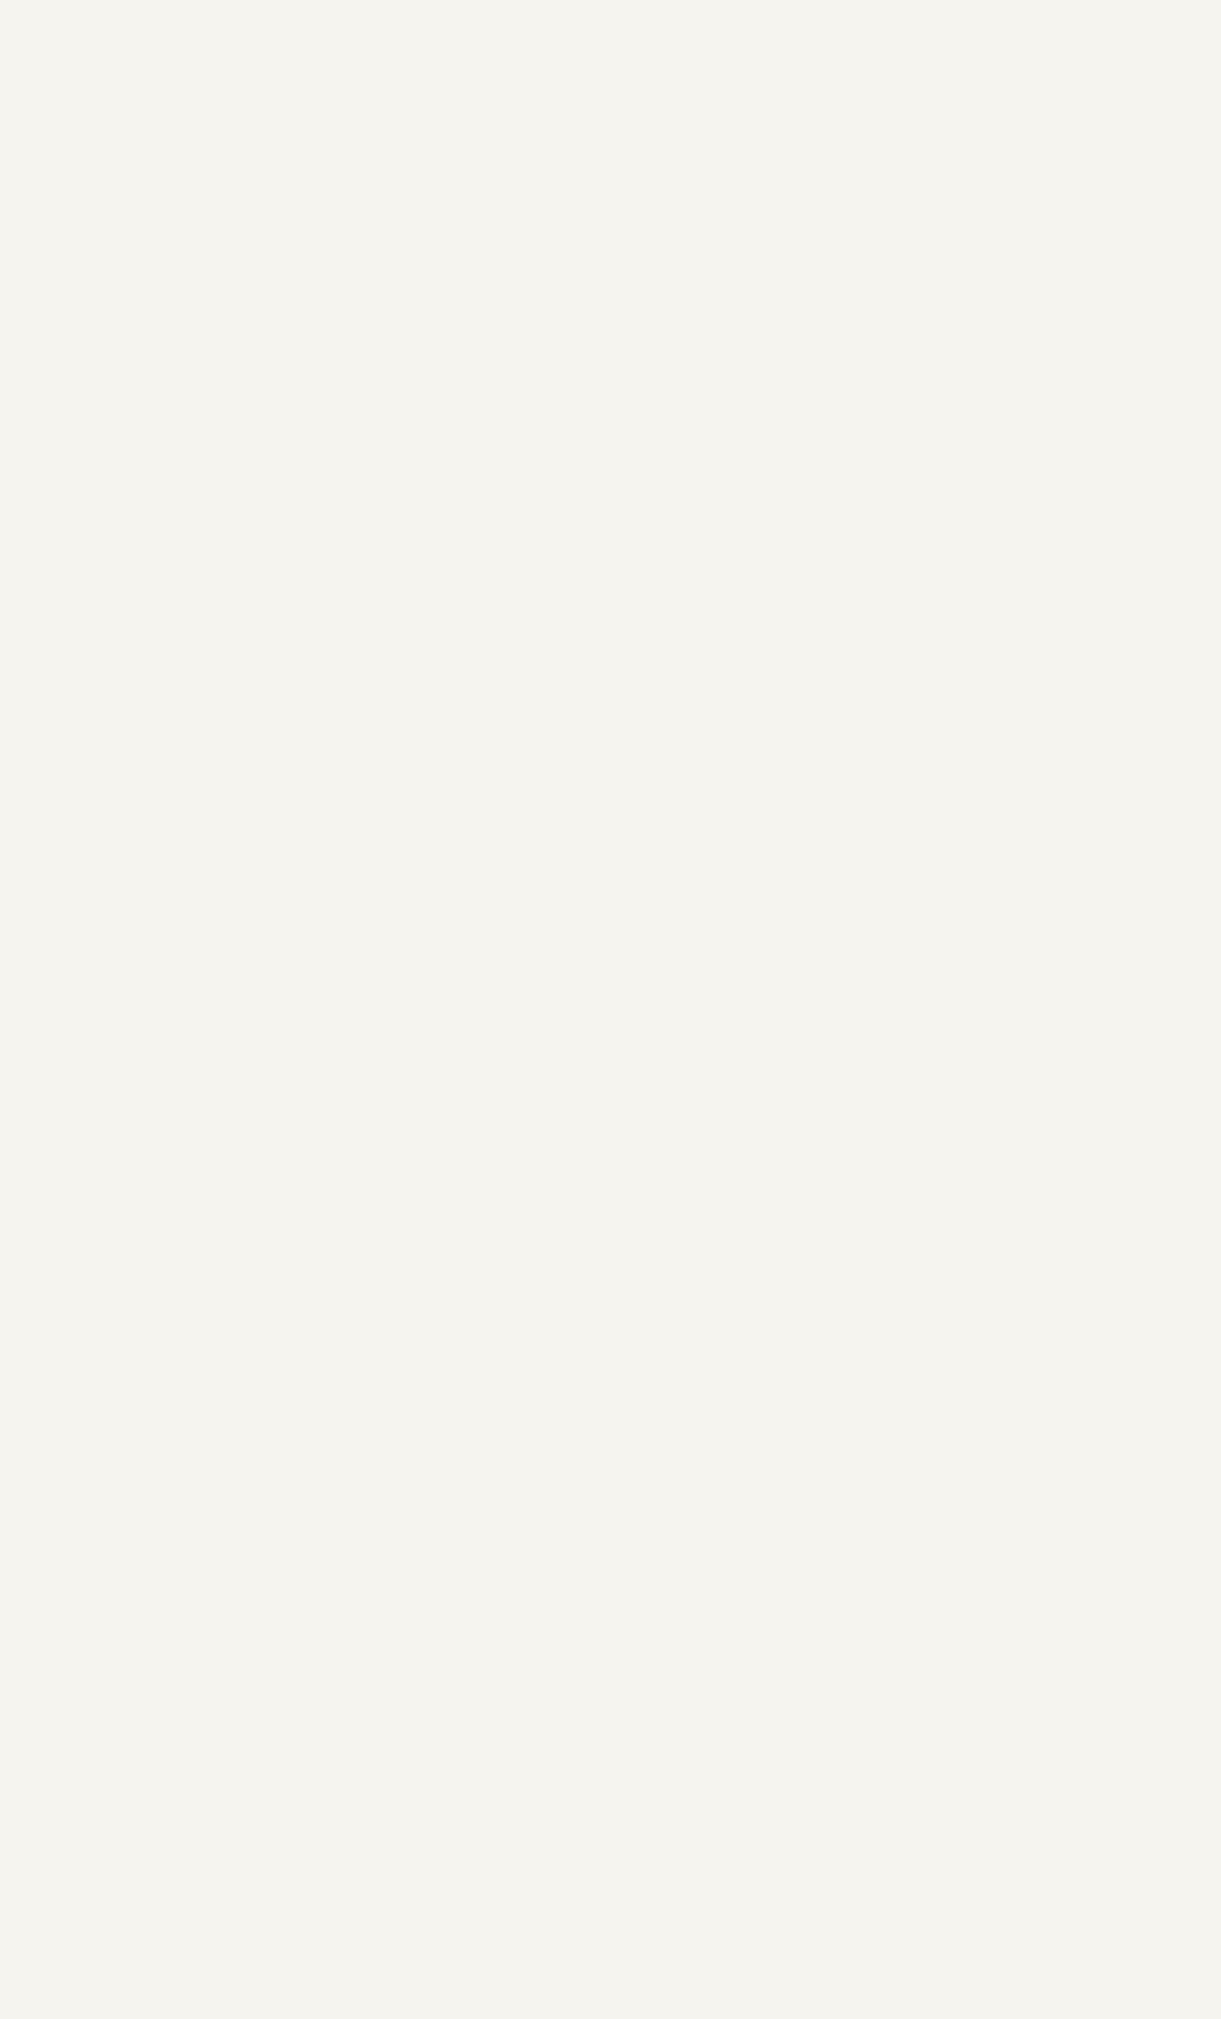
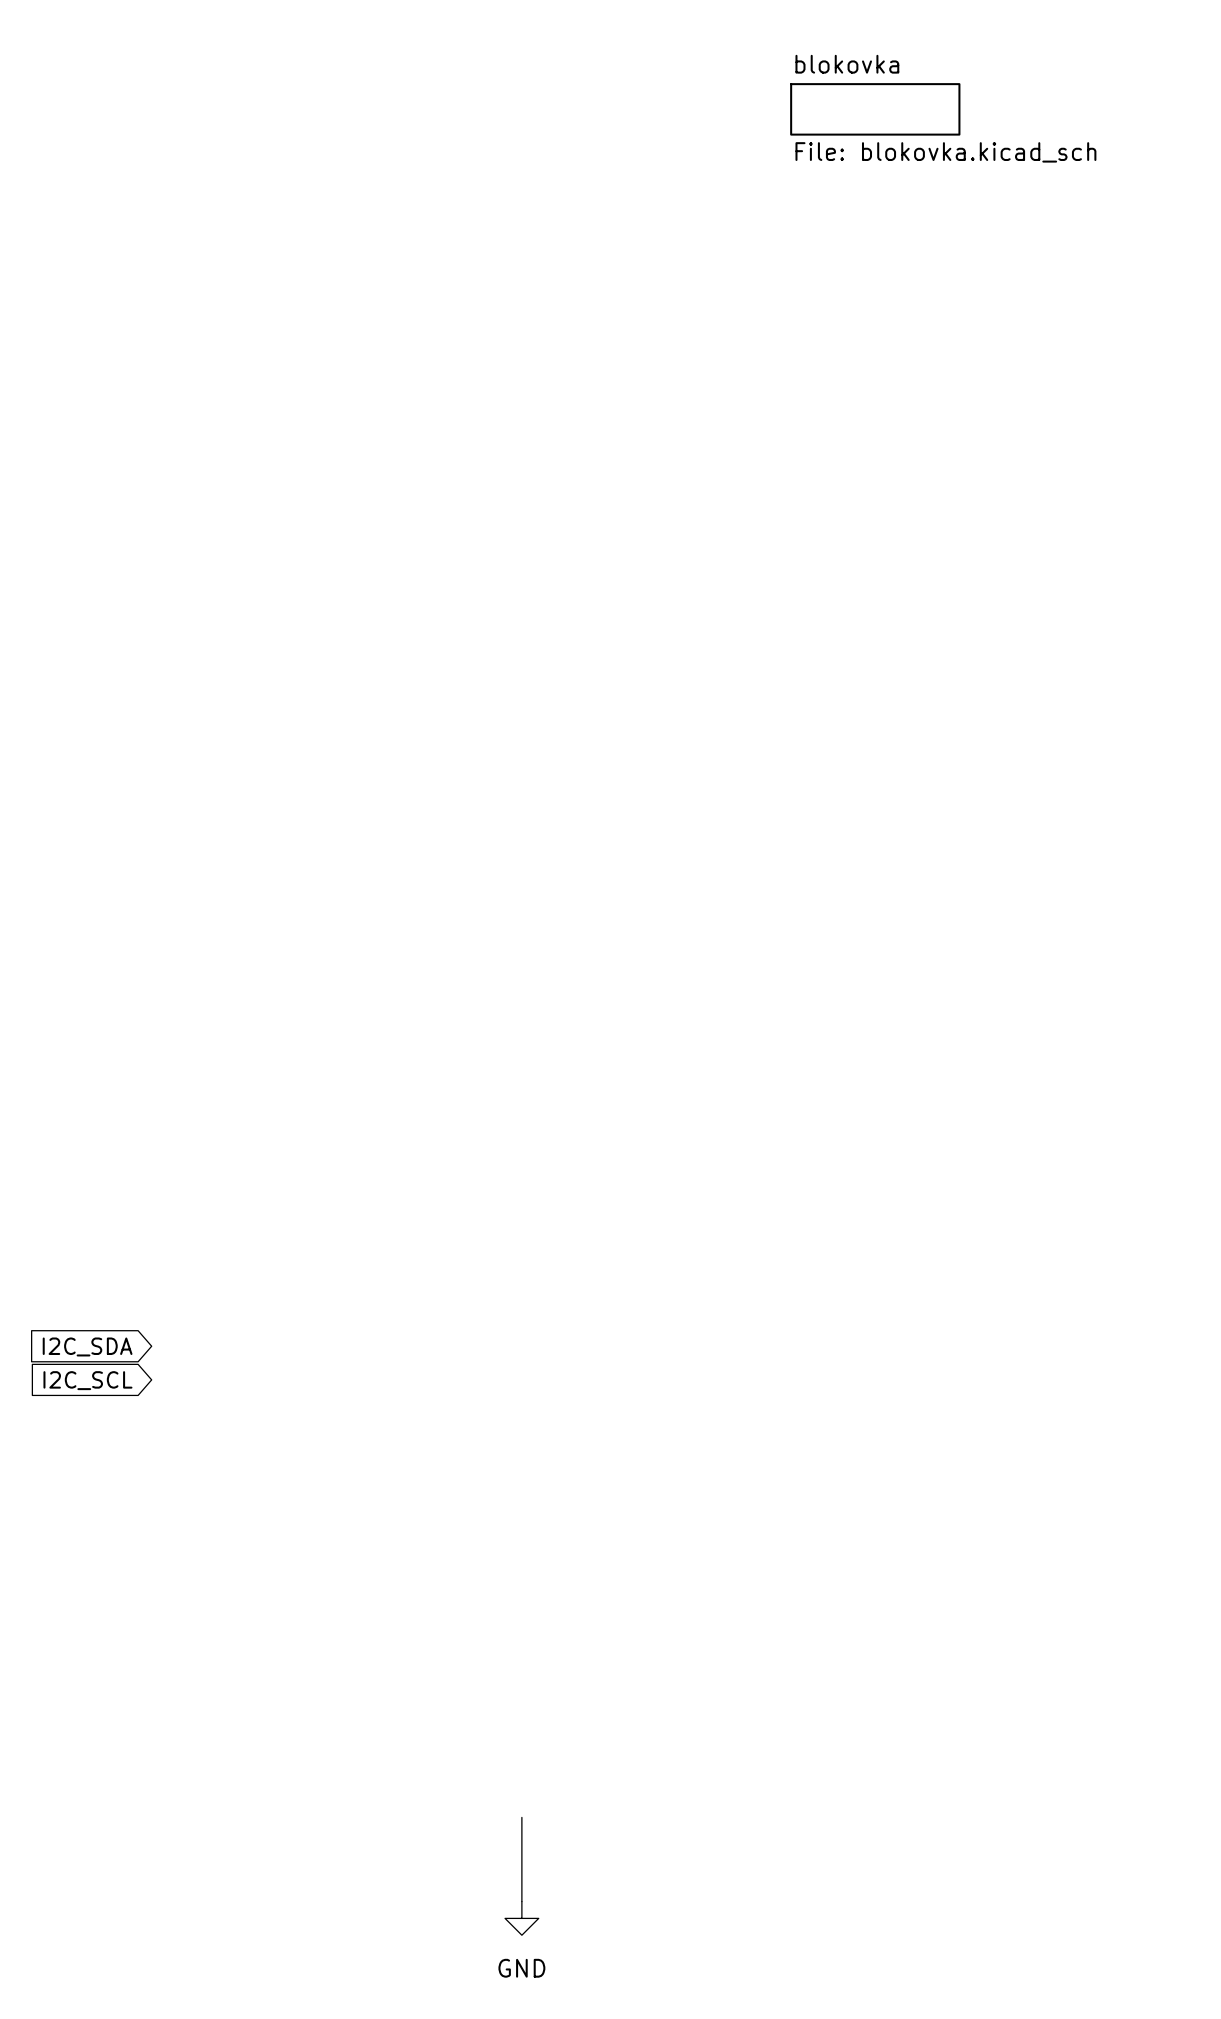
sheet blokovka: none -> File: blokovka.kicad_sch (875, 109)
global label: none -> I2C_SDA (87, 1346)
global label: none -> I2C_SCL (87, 1380)
wire: none -> (521, 1817) (521, 1901)
power symbol: none -> GND (521, 1918)

